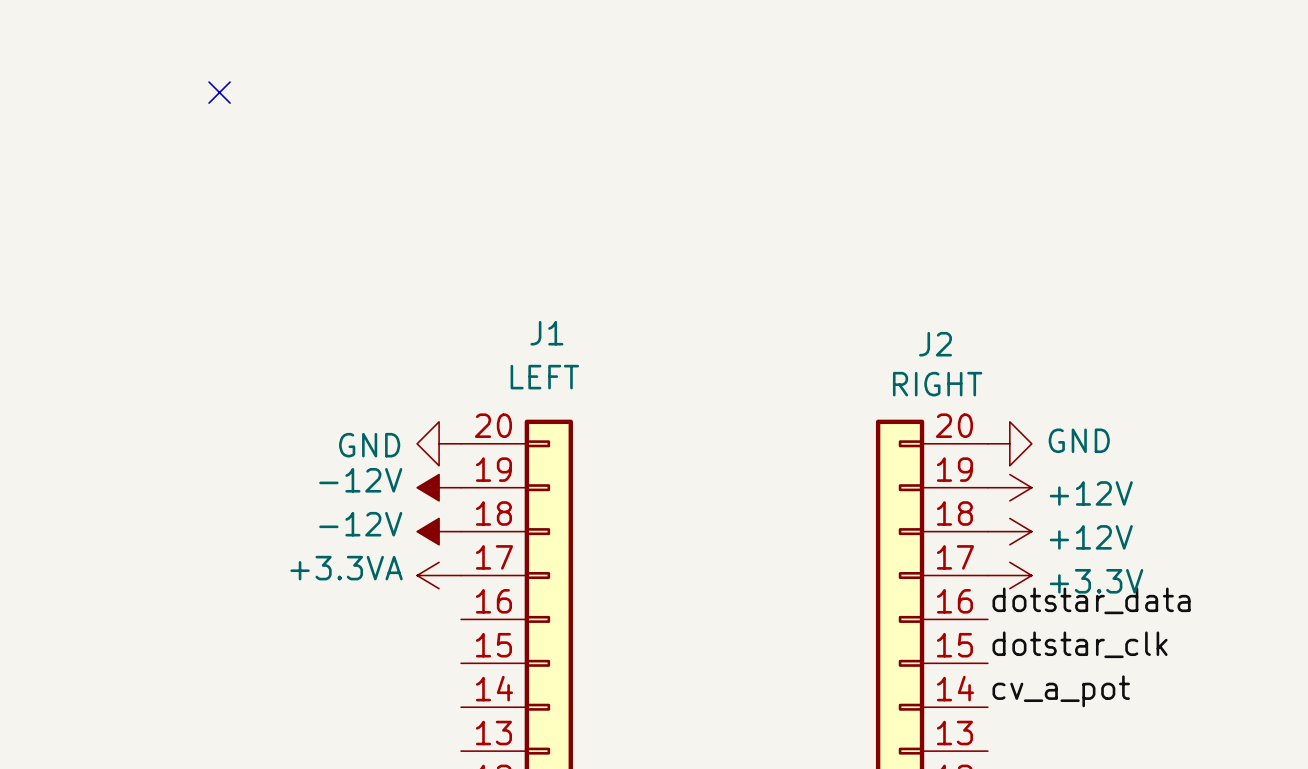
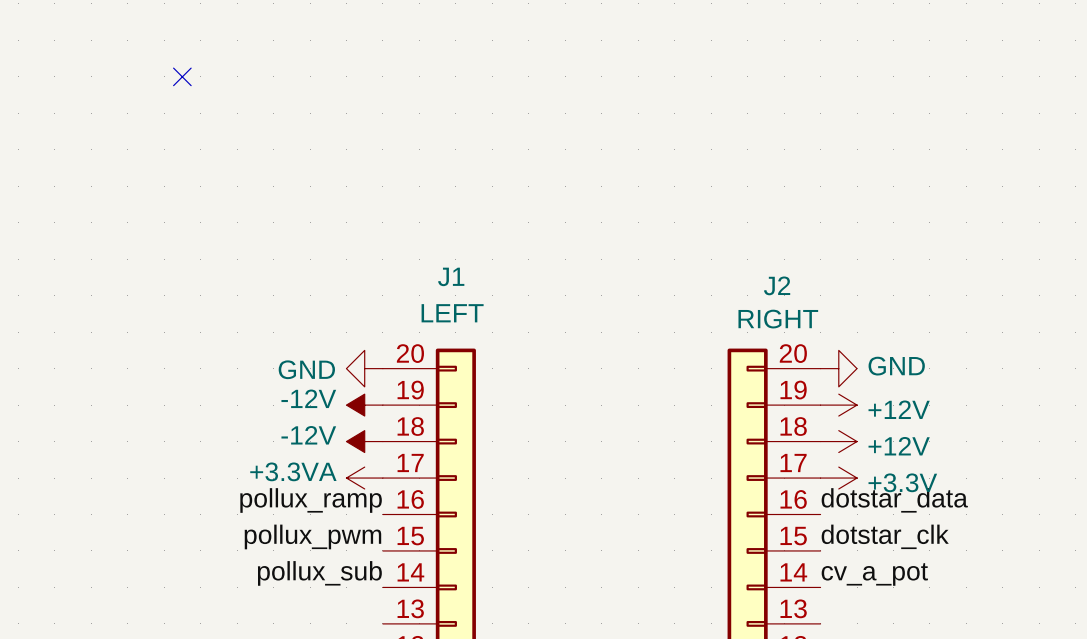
label: none -> pollux_ramp (311, 500)
label: none -> pollux_pwm (312, 536)
label: none -> pollux_sub (319, 573)

